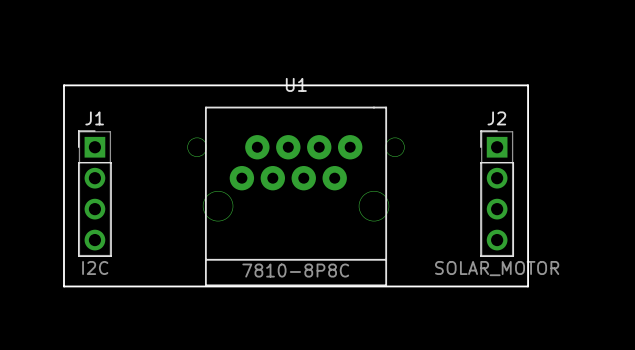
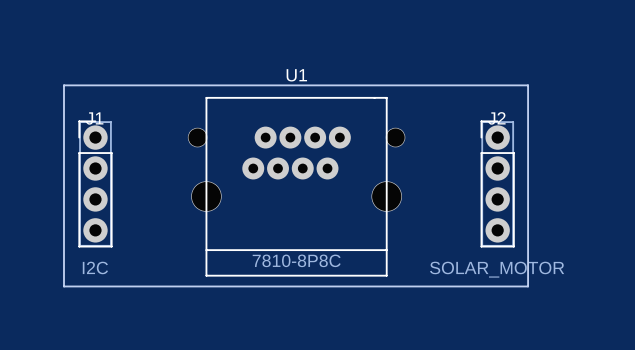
U1 footprint: [187, 106, 405, 287] -> [187, 96, 406, 277]
J1 footprint: [78, 130, 112, 257] -> [78, 120, 113, 248]
J2 footprint: [480, 130, 515, 257] -> [480, 120, 515, 248]

